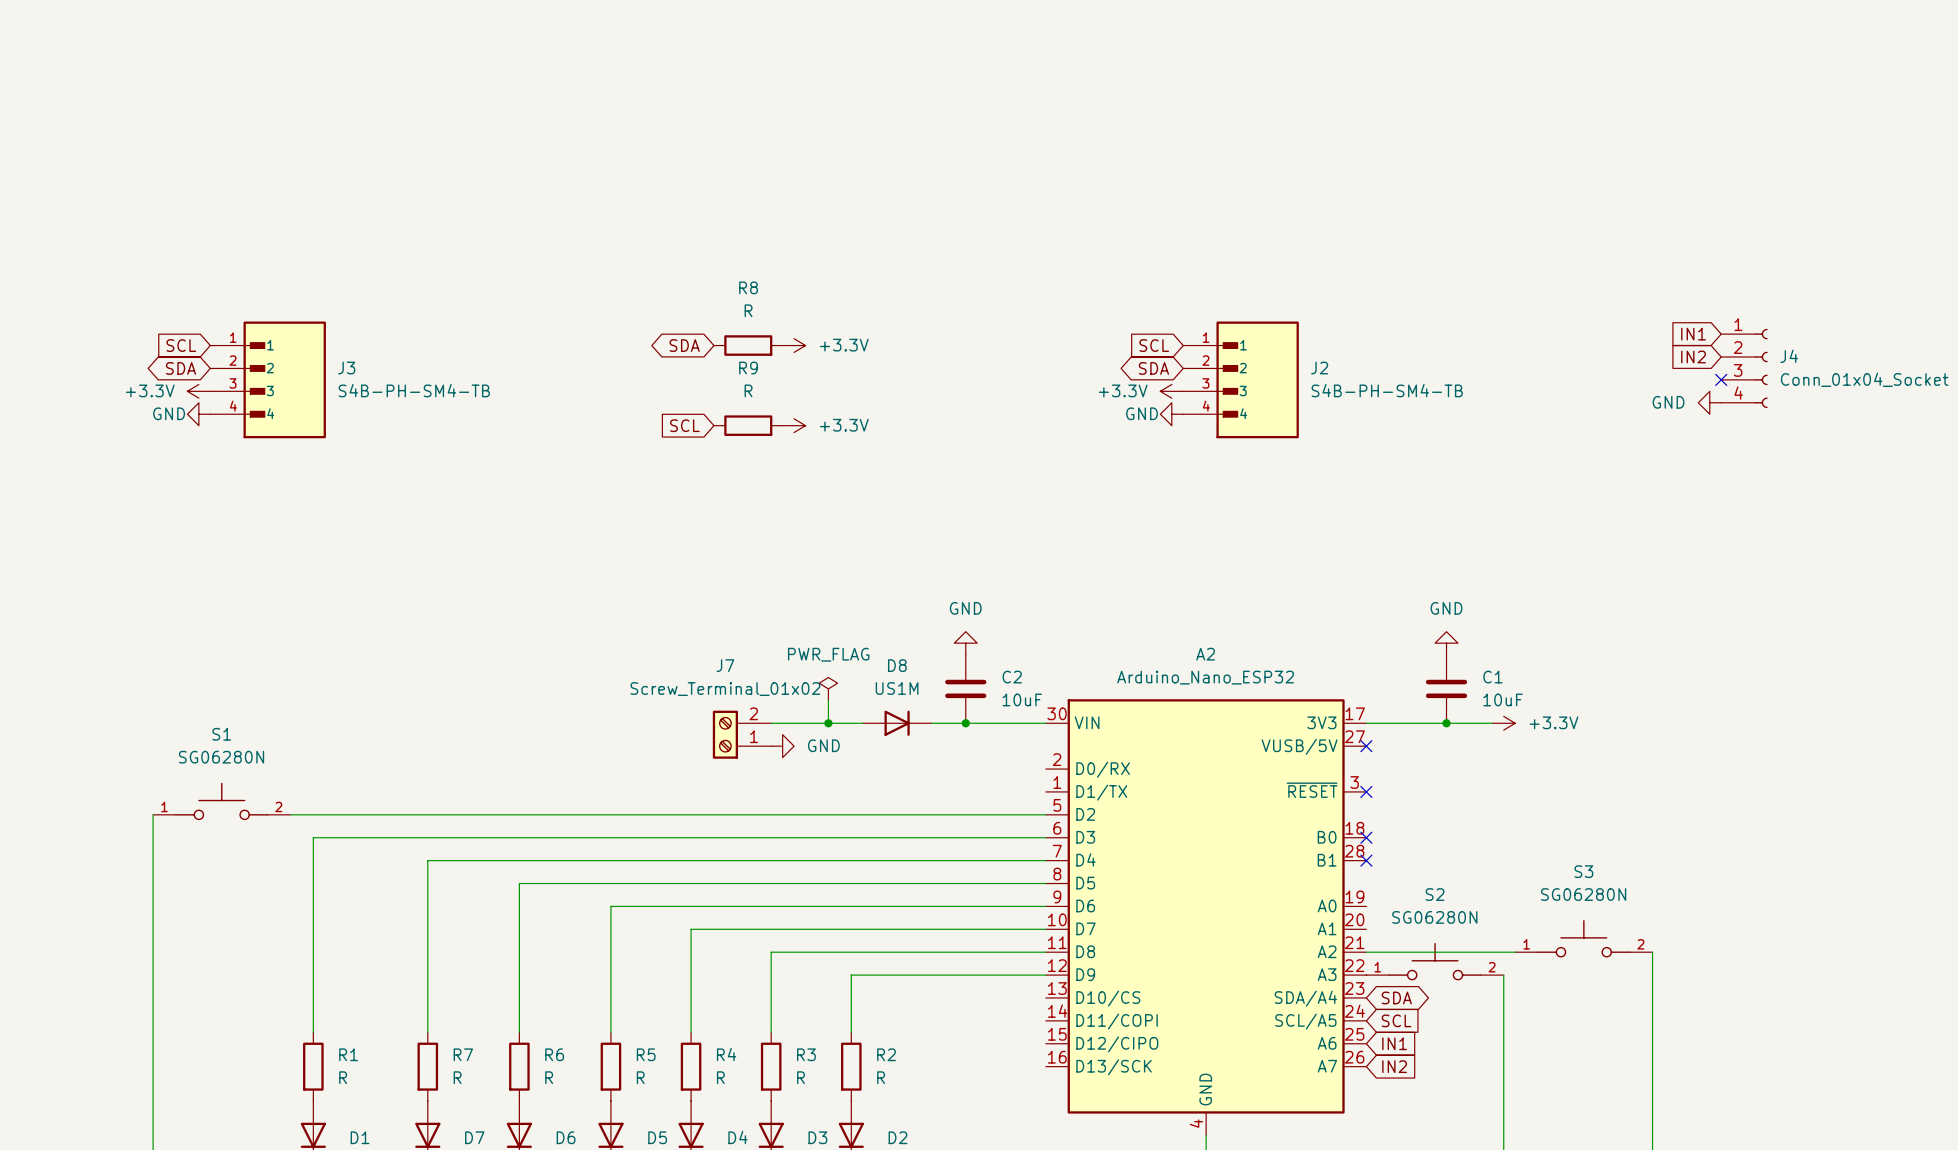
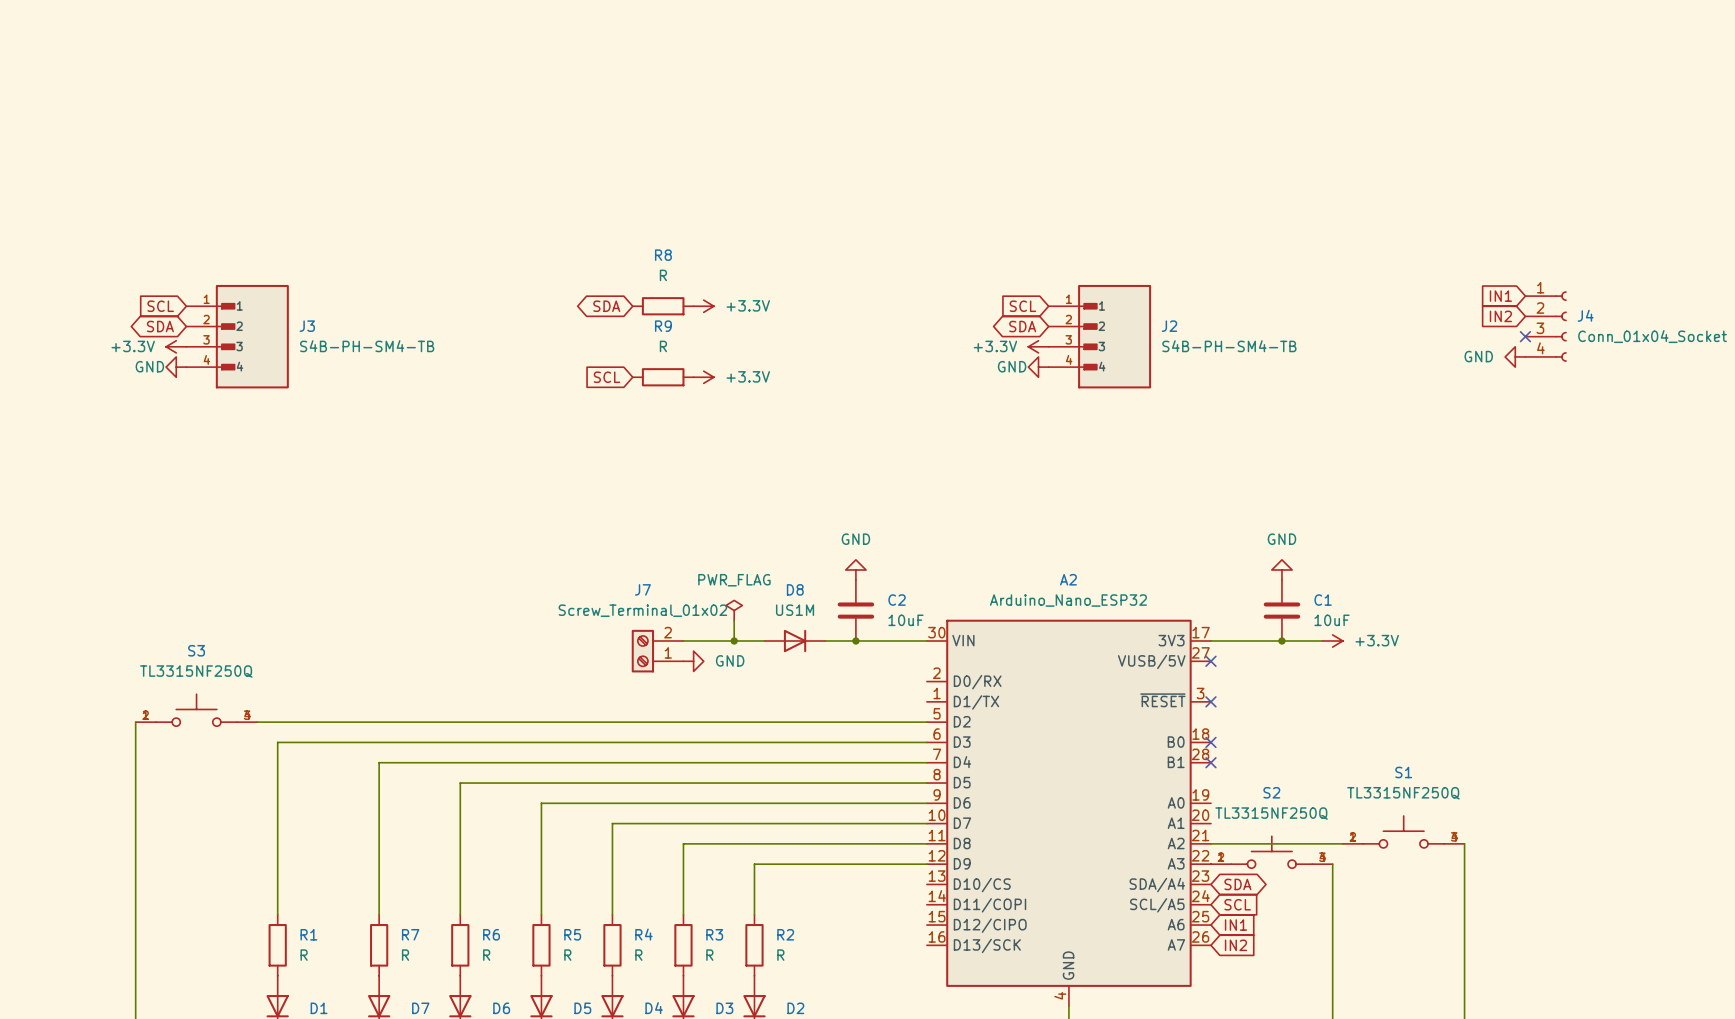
S1 value: SG06280N (221, 757) -> TL3315NF250Q (1403, 793)
S1 symbol: [153, 782, 291, 821] -> [1342, 815, 1465, 849]
S3 value: SG06280N (1583, 894) -> TL3315NF250Q (196, 671)
S2 value: SG06280N (1434, 917) -> TL3315NF250Q (1271, 813)
S3 symbol: [1515, 920, 1653, 958] -> [135, 693, 258, 727]
S2 symbol: [1366, 942, 1504, 981] -> [1210, 835, 1333, 869]

